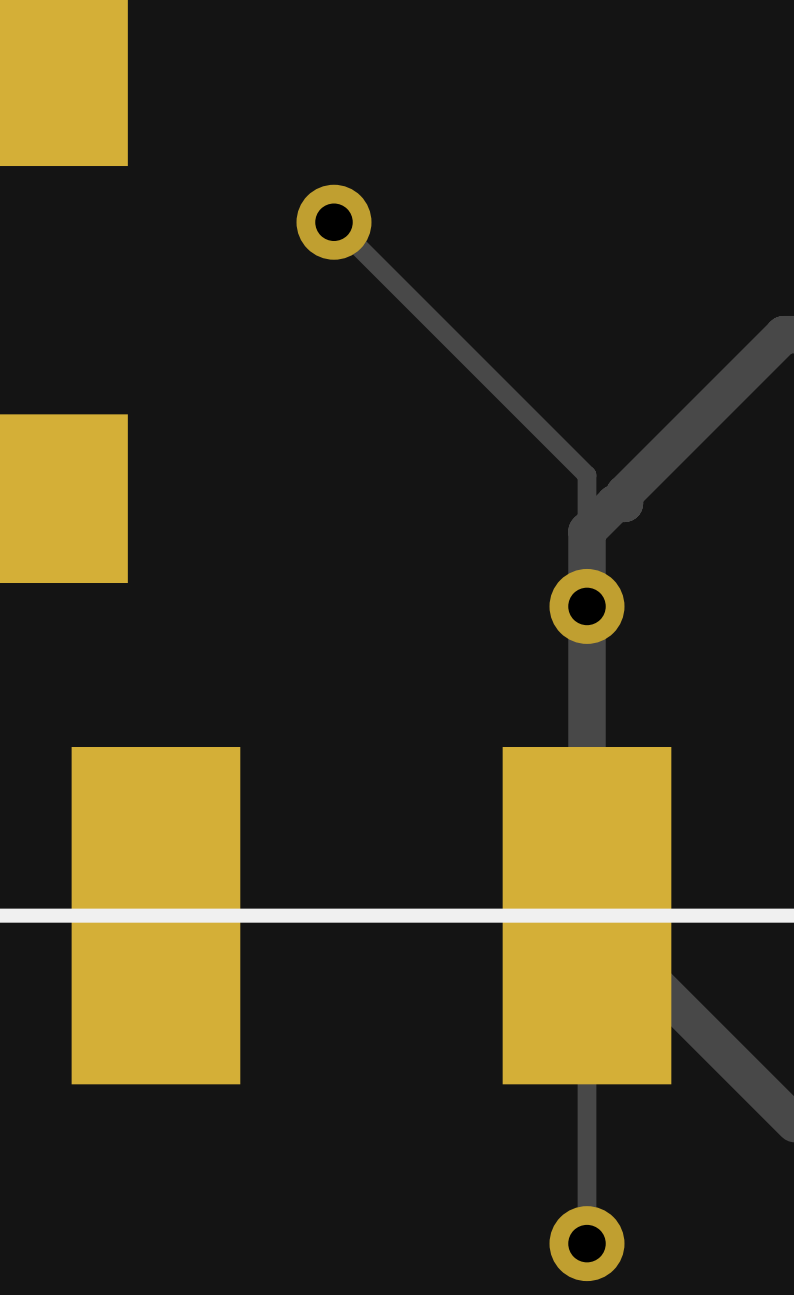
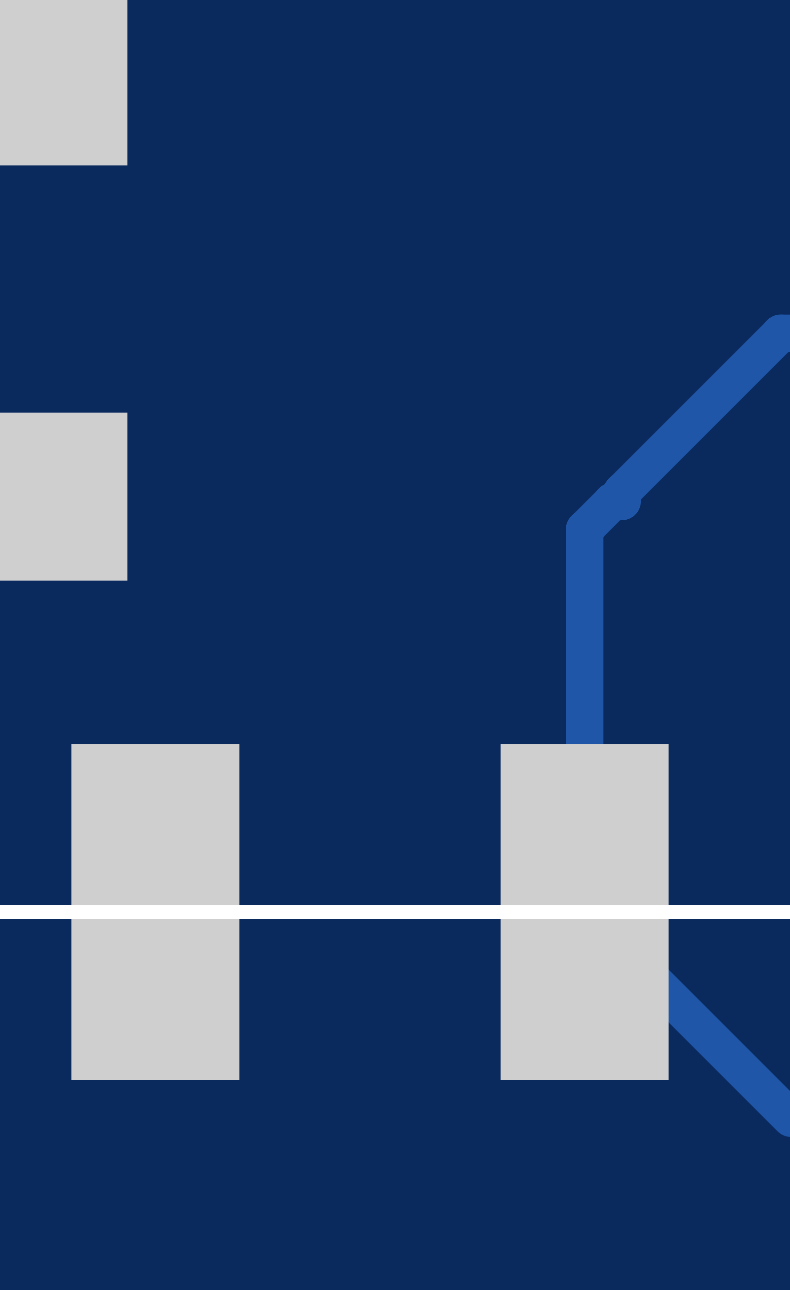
track: (333, 222) (586, 475) (586, 1243) -> none
via: (333, 222) -> none
via: (586, 606) -> none
via: (586, 1243) -> none

